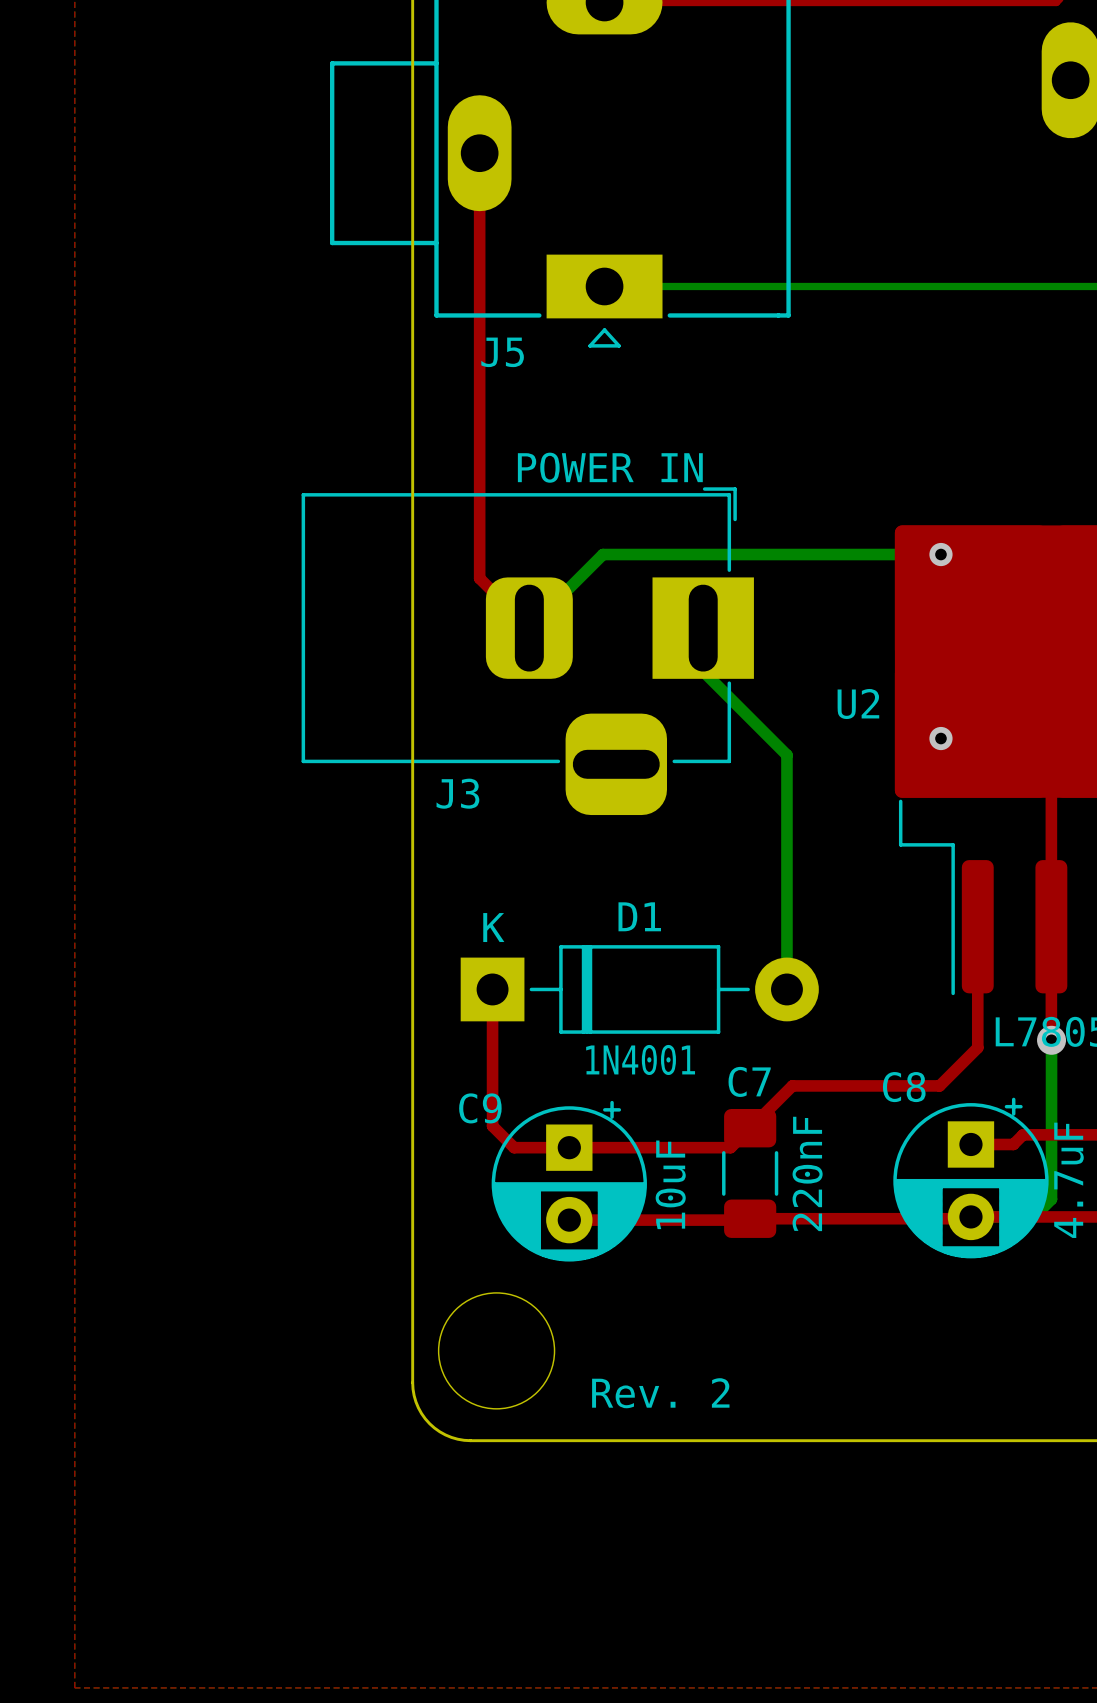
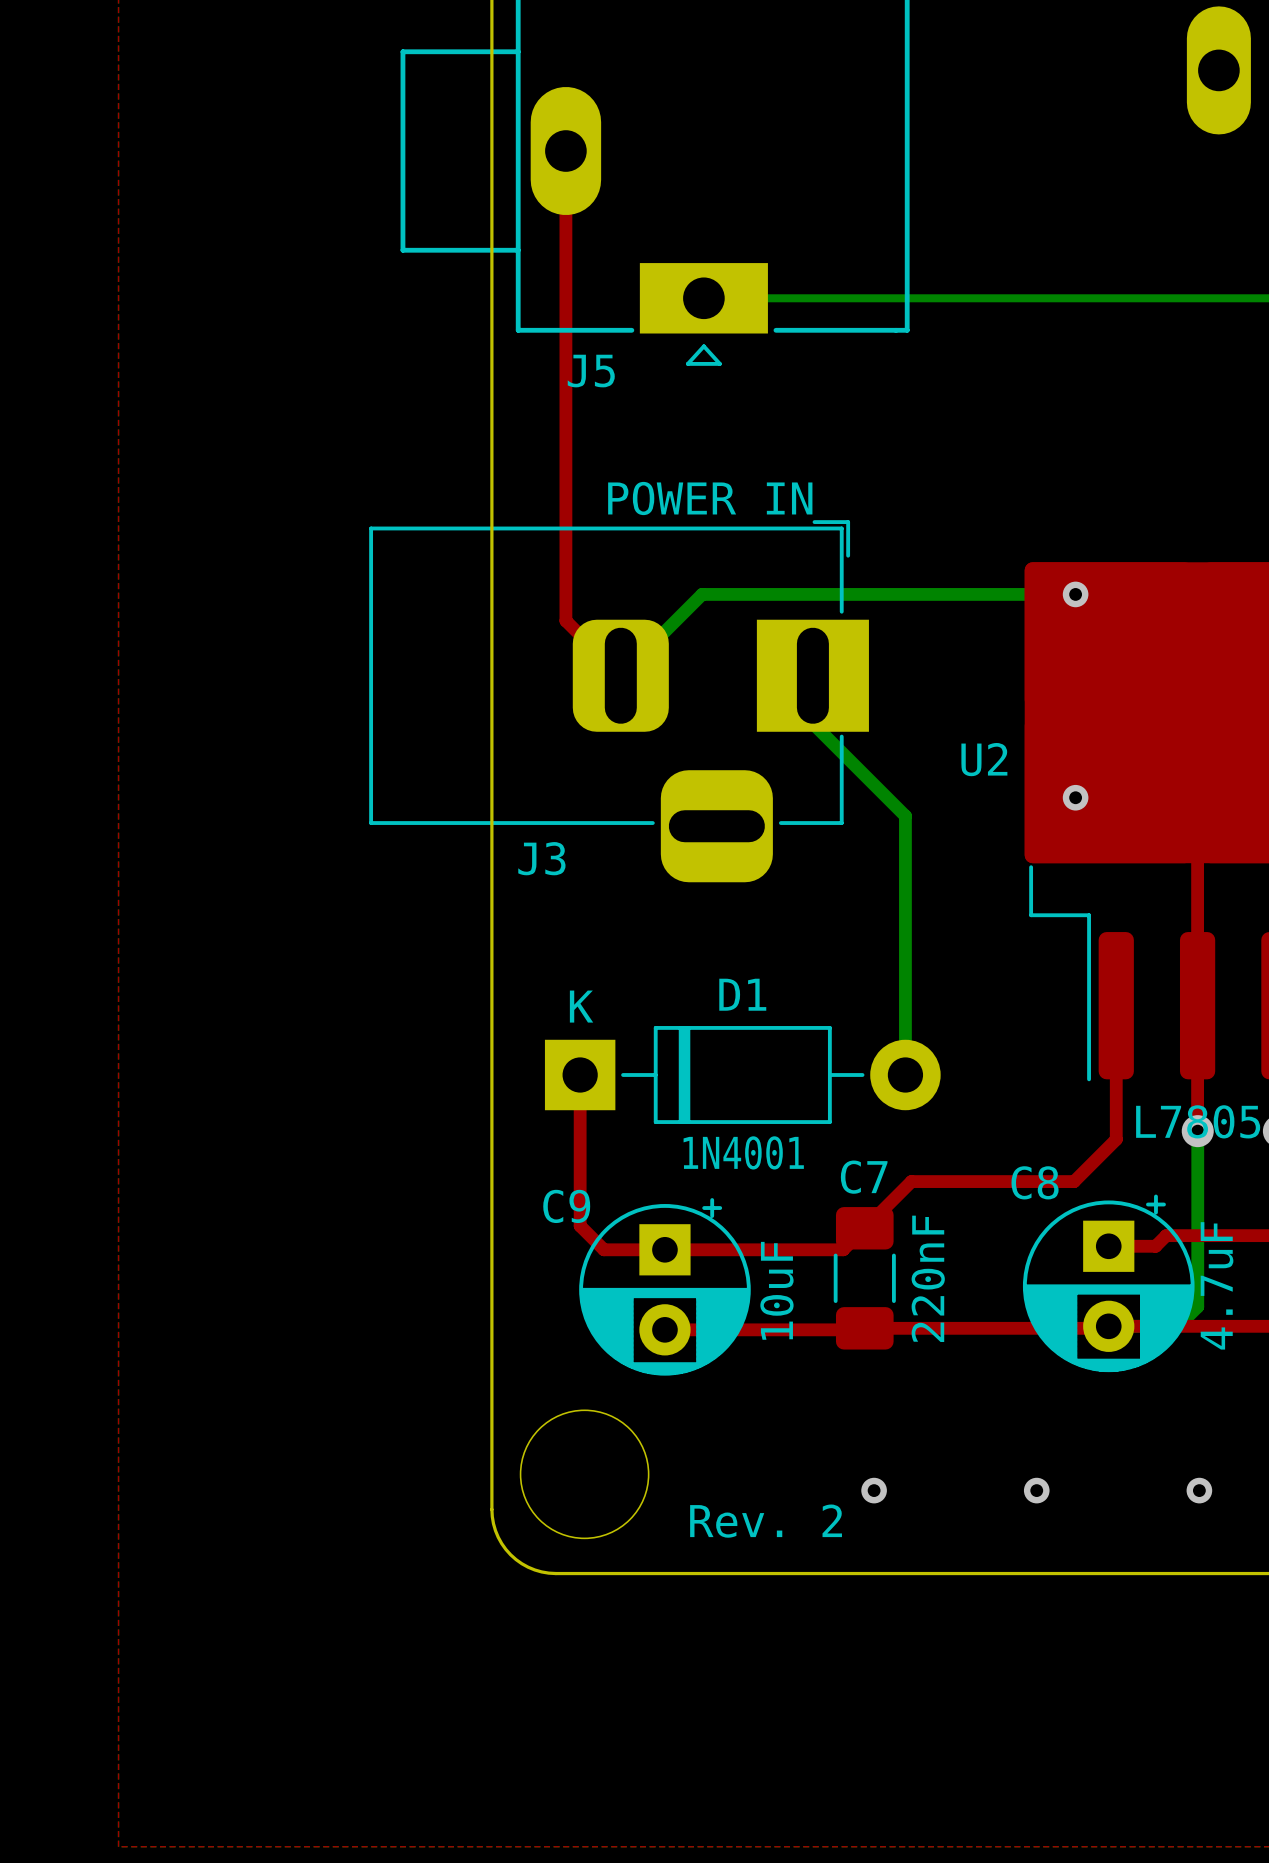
via: none -> (874, 1490)
via: none -> (1036, 1490)
via: none -> (1199, 1490)

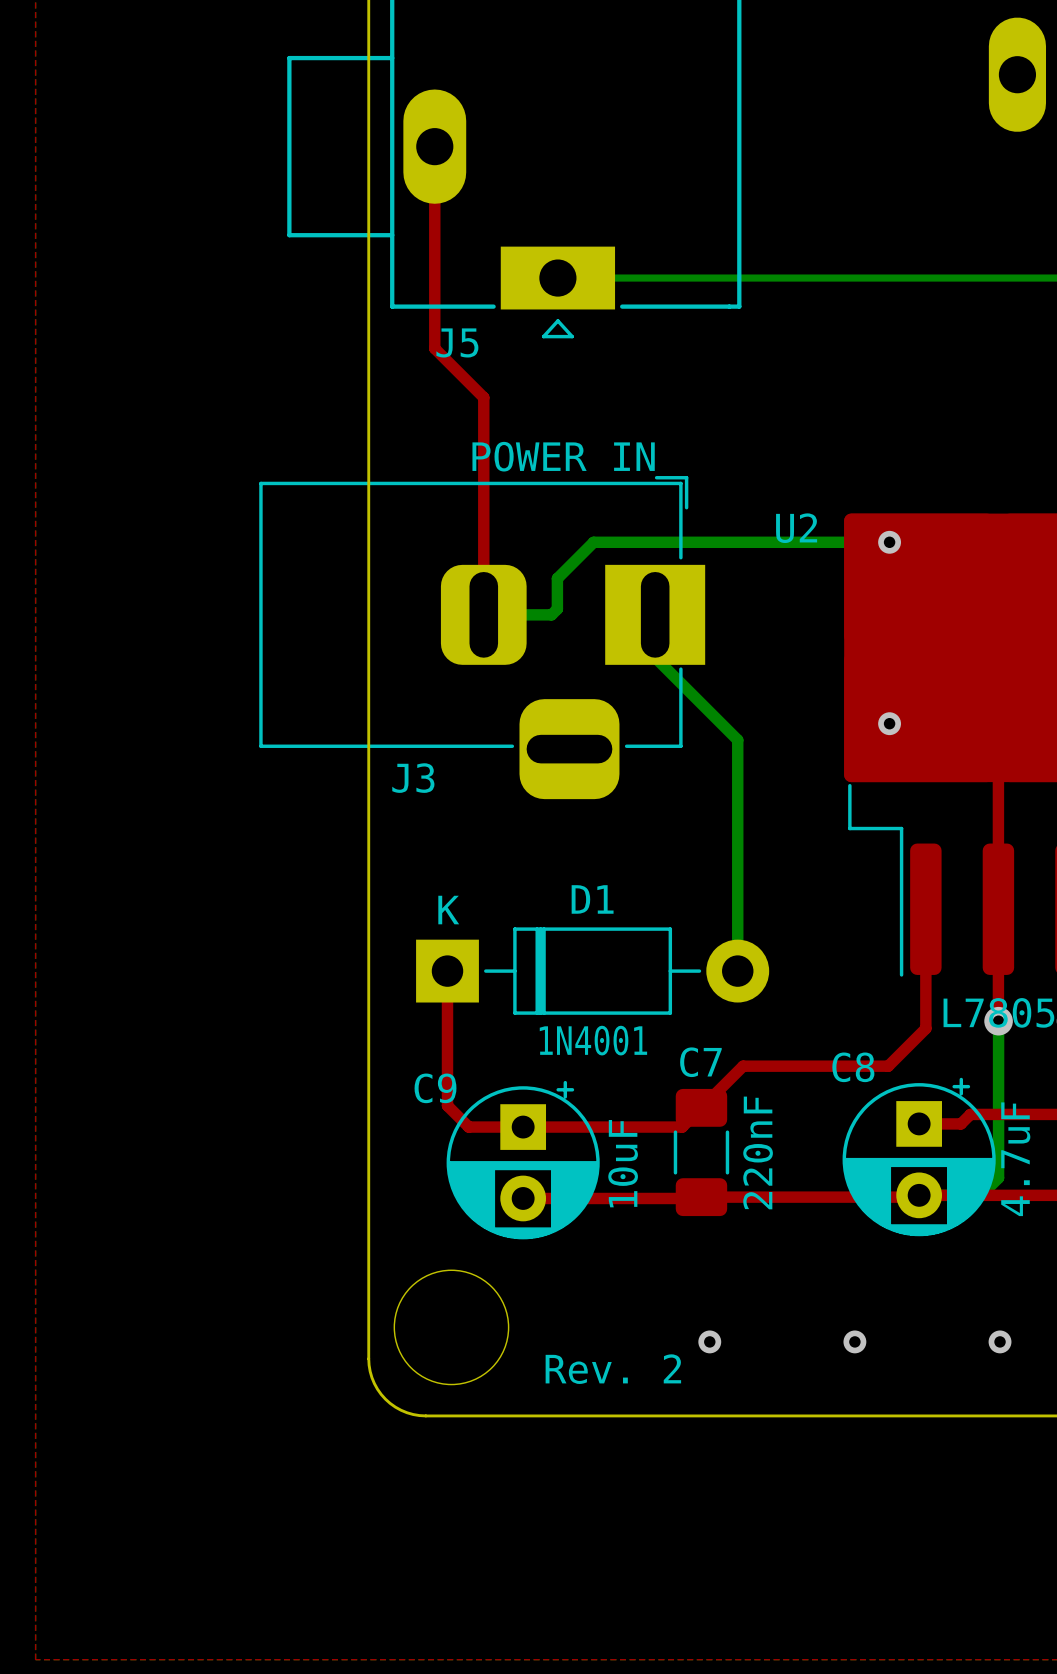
top track: (565, 377) (565, 620) (620, 675) -> (434, 348) (483, 397) (483, 614)
bottom track: (743, 594) (702, 594) (620, 675) -> (593, 542) (557, 578) (557, 609) (551, 614) (483, 614)
U2 name position: U2 (984, 759) -> U2 (796, 528)

